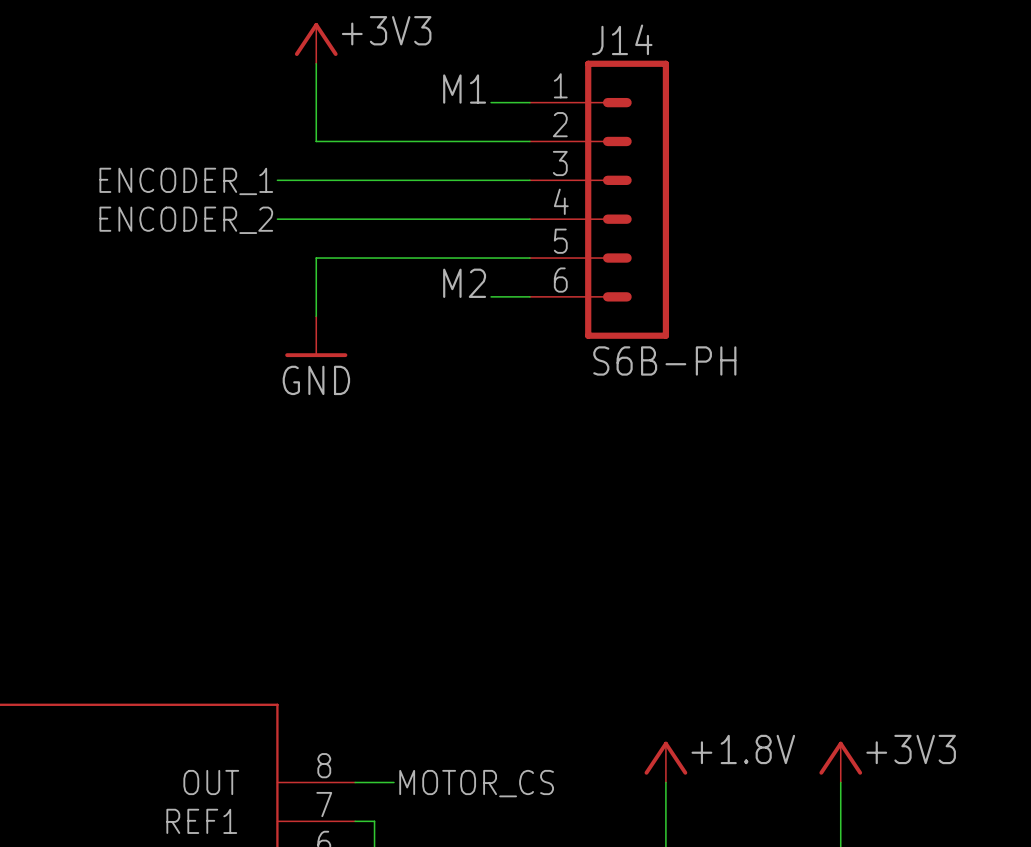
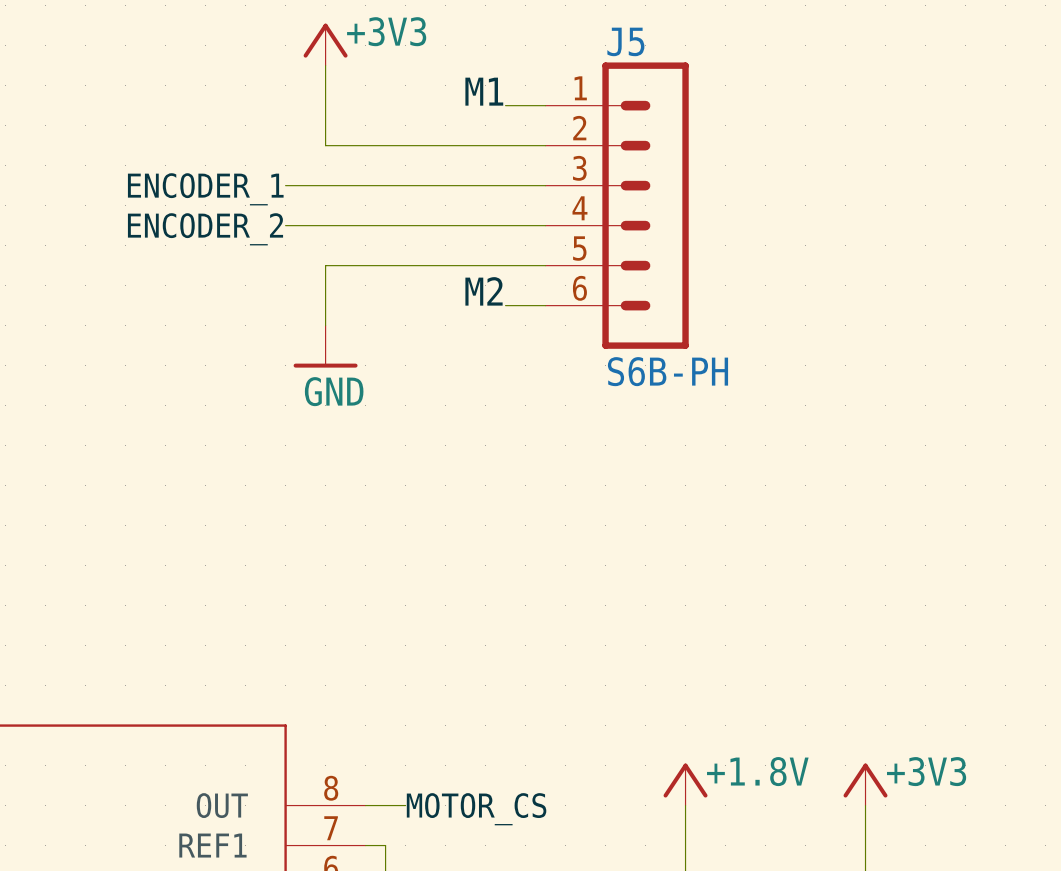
J14 name: J14 (622, 39) -> J5 (625, 41)

